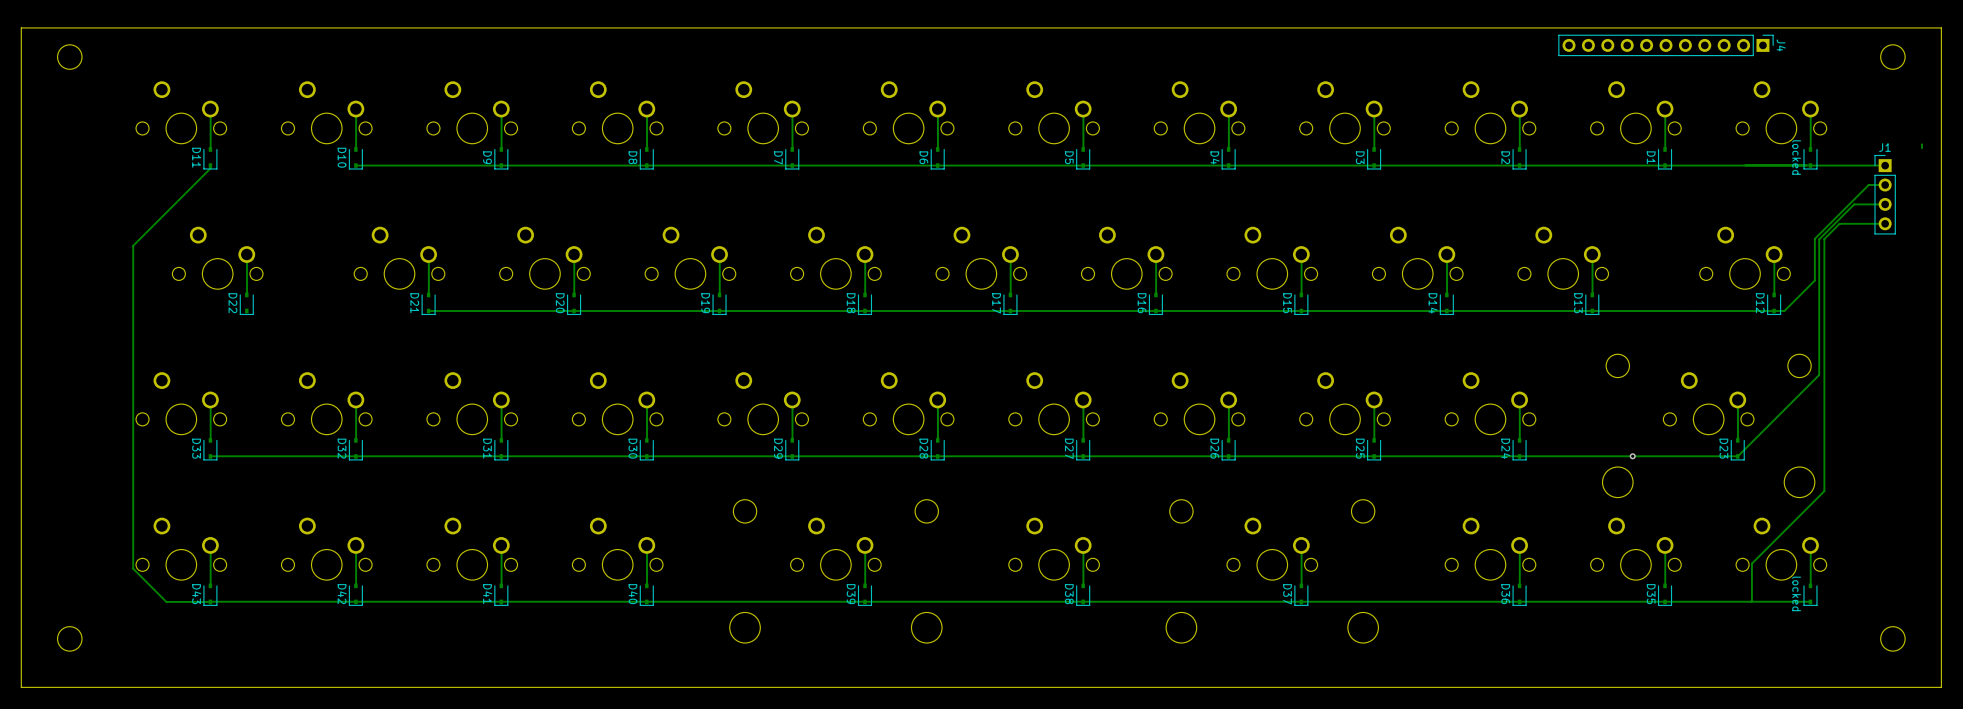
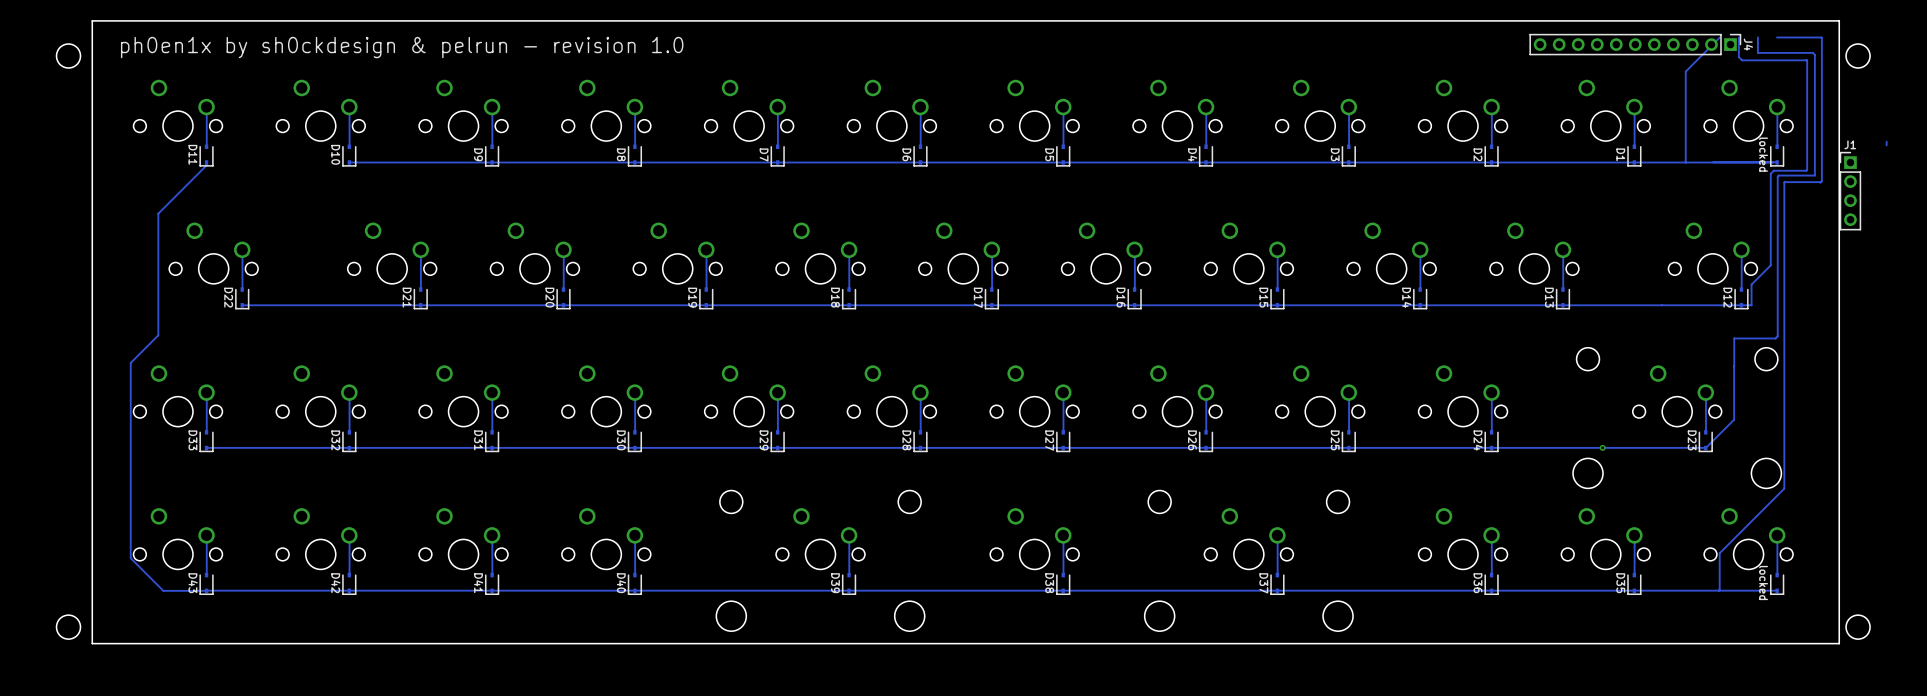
board edge: (1941, 27) (21, 27) (21, 687) (1941, 687) (1941, 27) -> (1839, 20) (1839, 643) (92, 643) (92, 20) (1839, 20)
track: none -> (1719, 37) (1685, 71) (1685, 162)
track: none -> (1738, 37) (1738, 57) (1742, 60) (1806, 60)
text: none -> ph0en1x by sh0ckdesign & pelrun - revision 1.0 (402, 47)
track: (1885, 165) (1810, 165) -> none
track: (1885, 185) (1868, 185) (1814, 238) (1814, 280) (1784, 311) -> (1806, 59) (1807, 170) (1773, 170) (1770, 173) (1770, 265) (1751, 284) (1751, 305)
track: (1885, 204) (1854, 204) (1819, 239) (1819, 375) (1766, 427) -> (1757, 37) (1757, 52) (1812, 52) (1814, 54) (1814, 175) (1777, 176) (1777, 336) (1775, 338) (1734, 338) (1734, 419)
track: (161, 217) (133, 245) (133, 369) -> (158, 213) (158, 335) (130, 362)
track: (1885, 223) (1839, 223) (1824, 239) (1824, 491) (1817, 497) -> (1776, 37) (1821, 37) (1821, 181) (1784, 182) (1784, 488)
track: none -> (420, 305) (242, 305)

